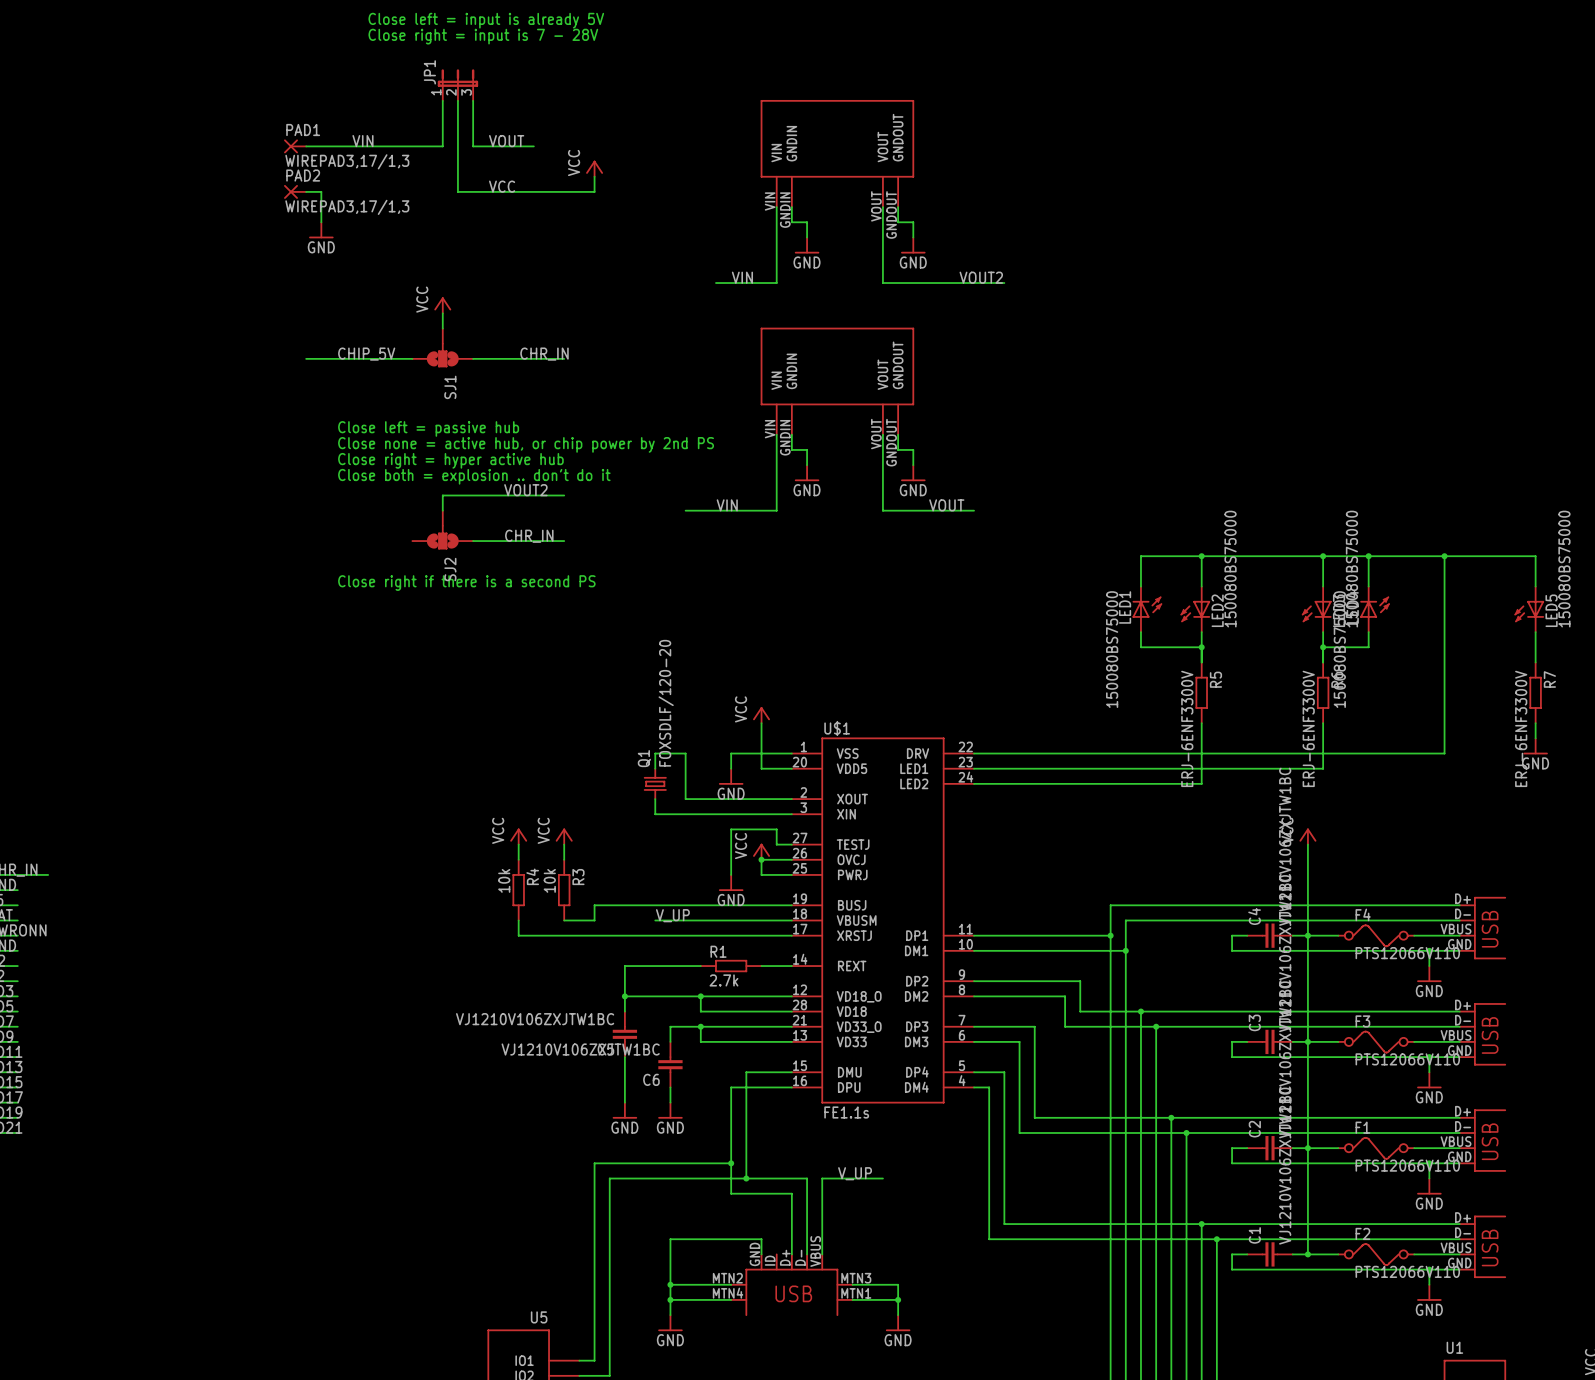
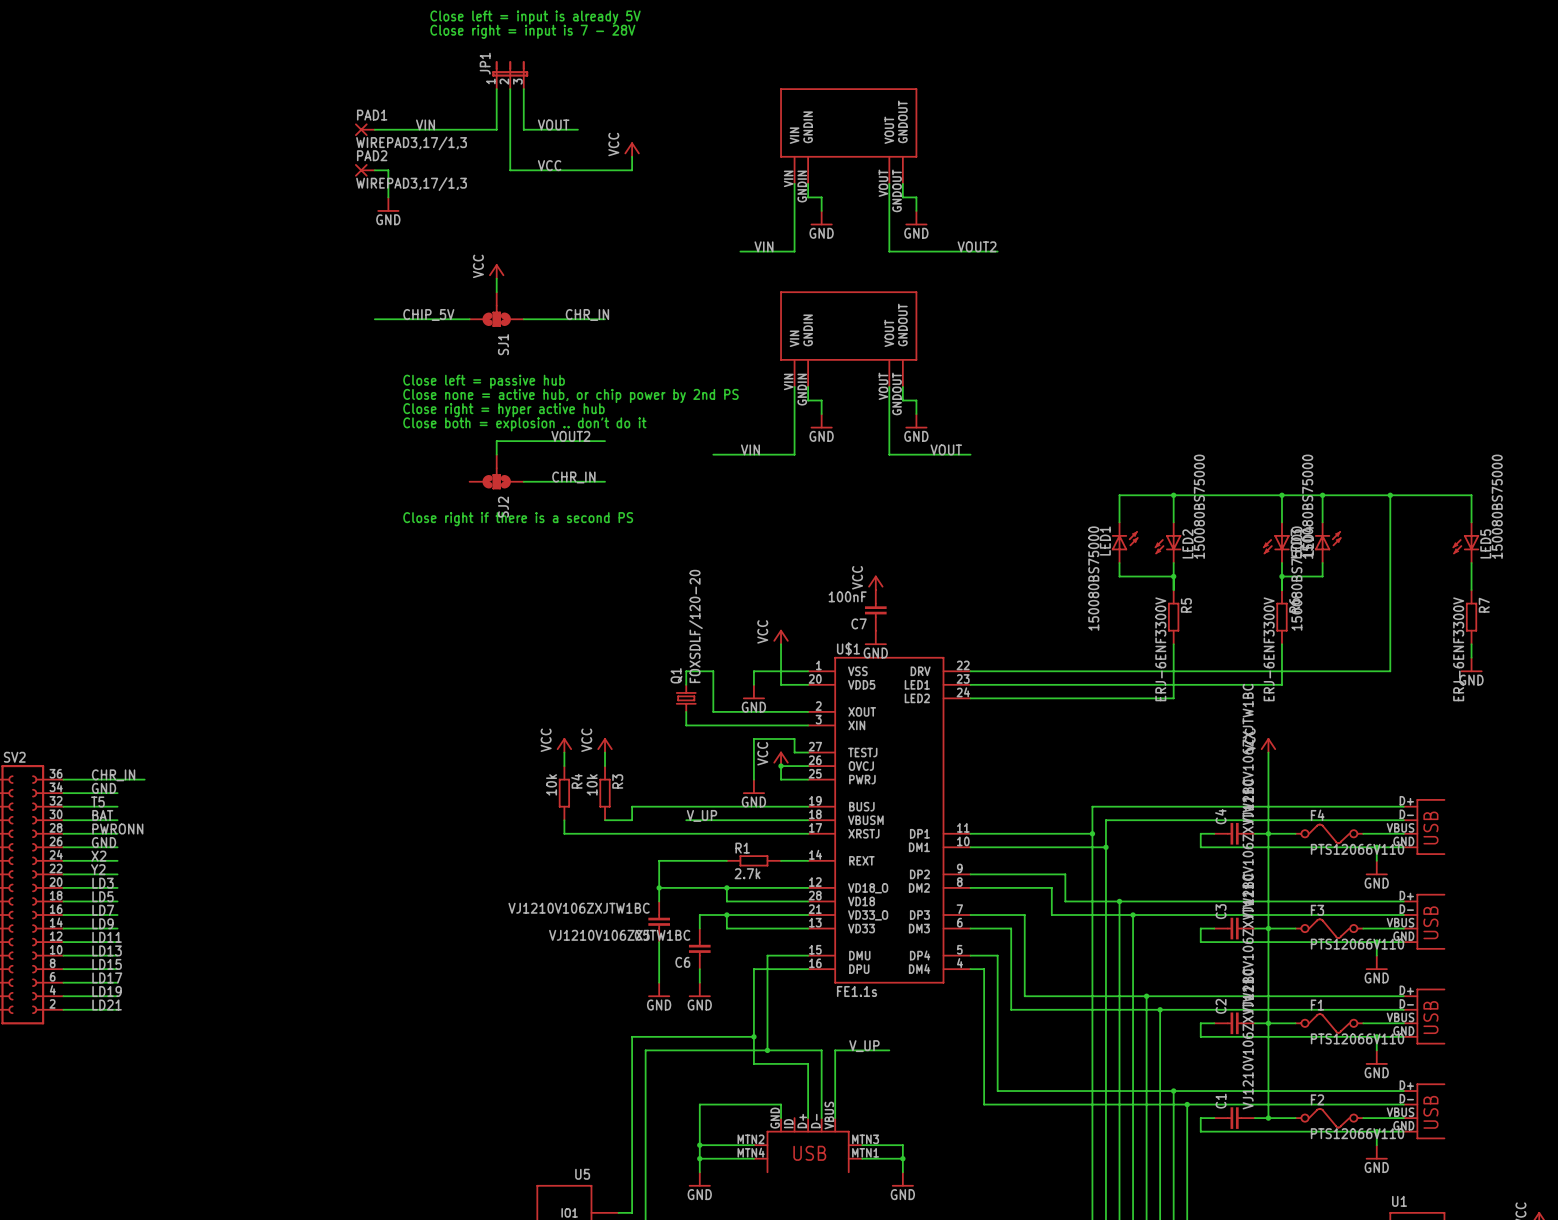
power symbol: none -> VCC (875, 582)
C7: none -> 100nF (875, 610)
power symbol: none -> GND (875, 637)

